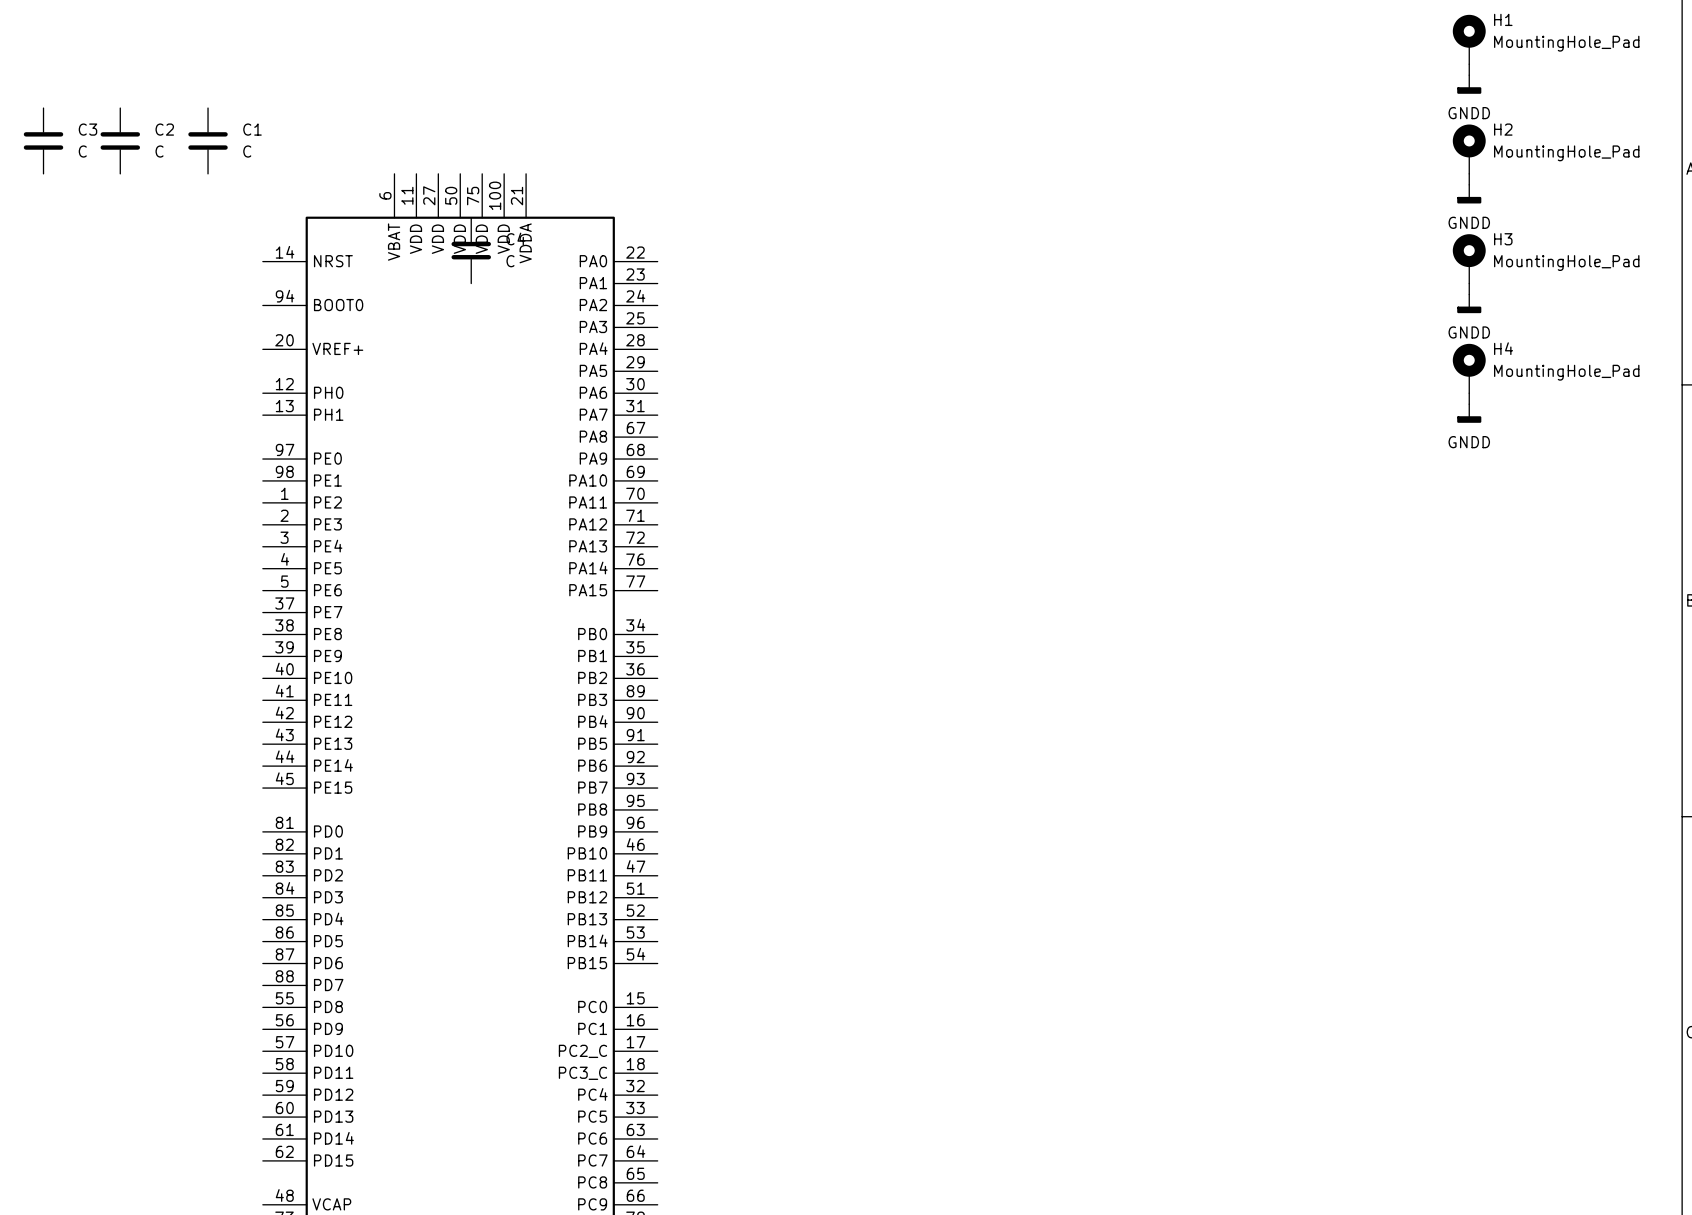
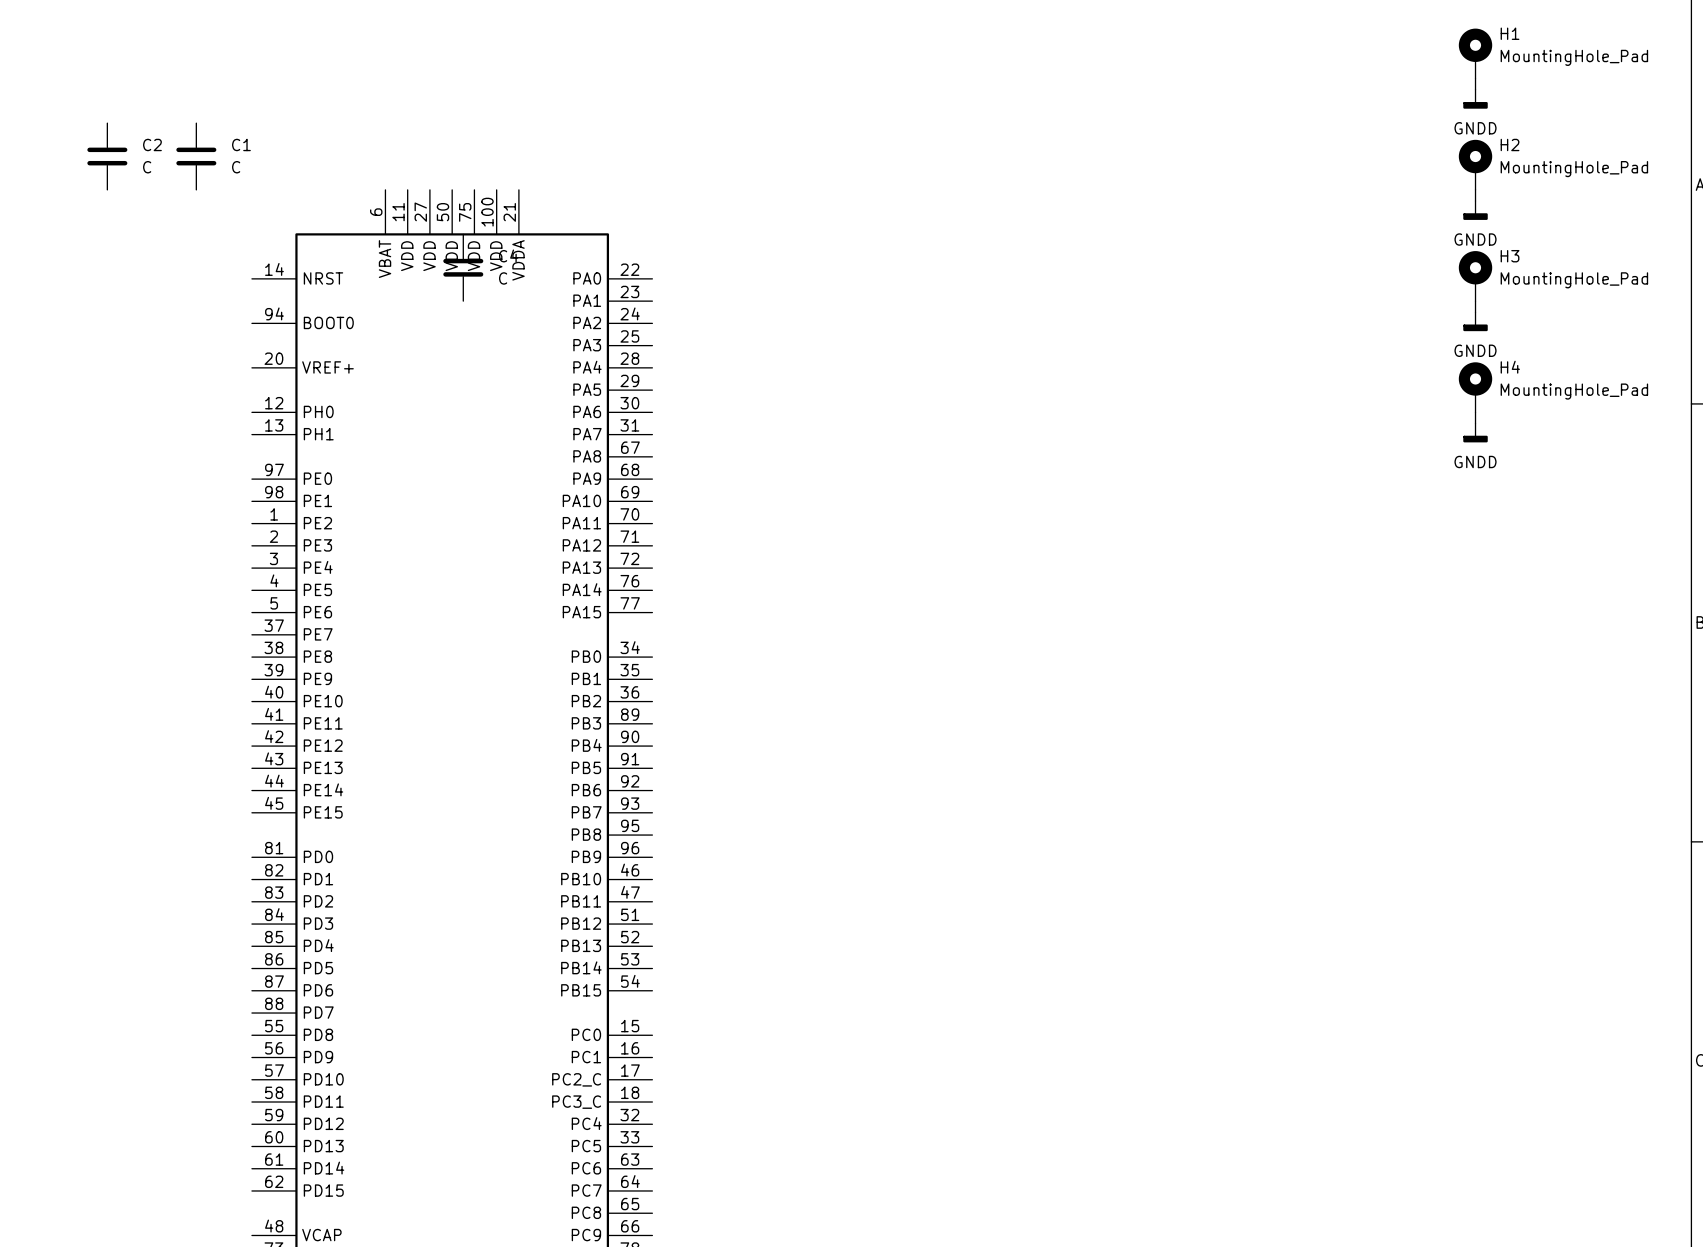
C3: C (43, 140) -> none

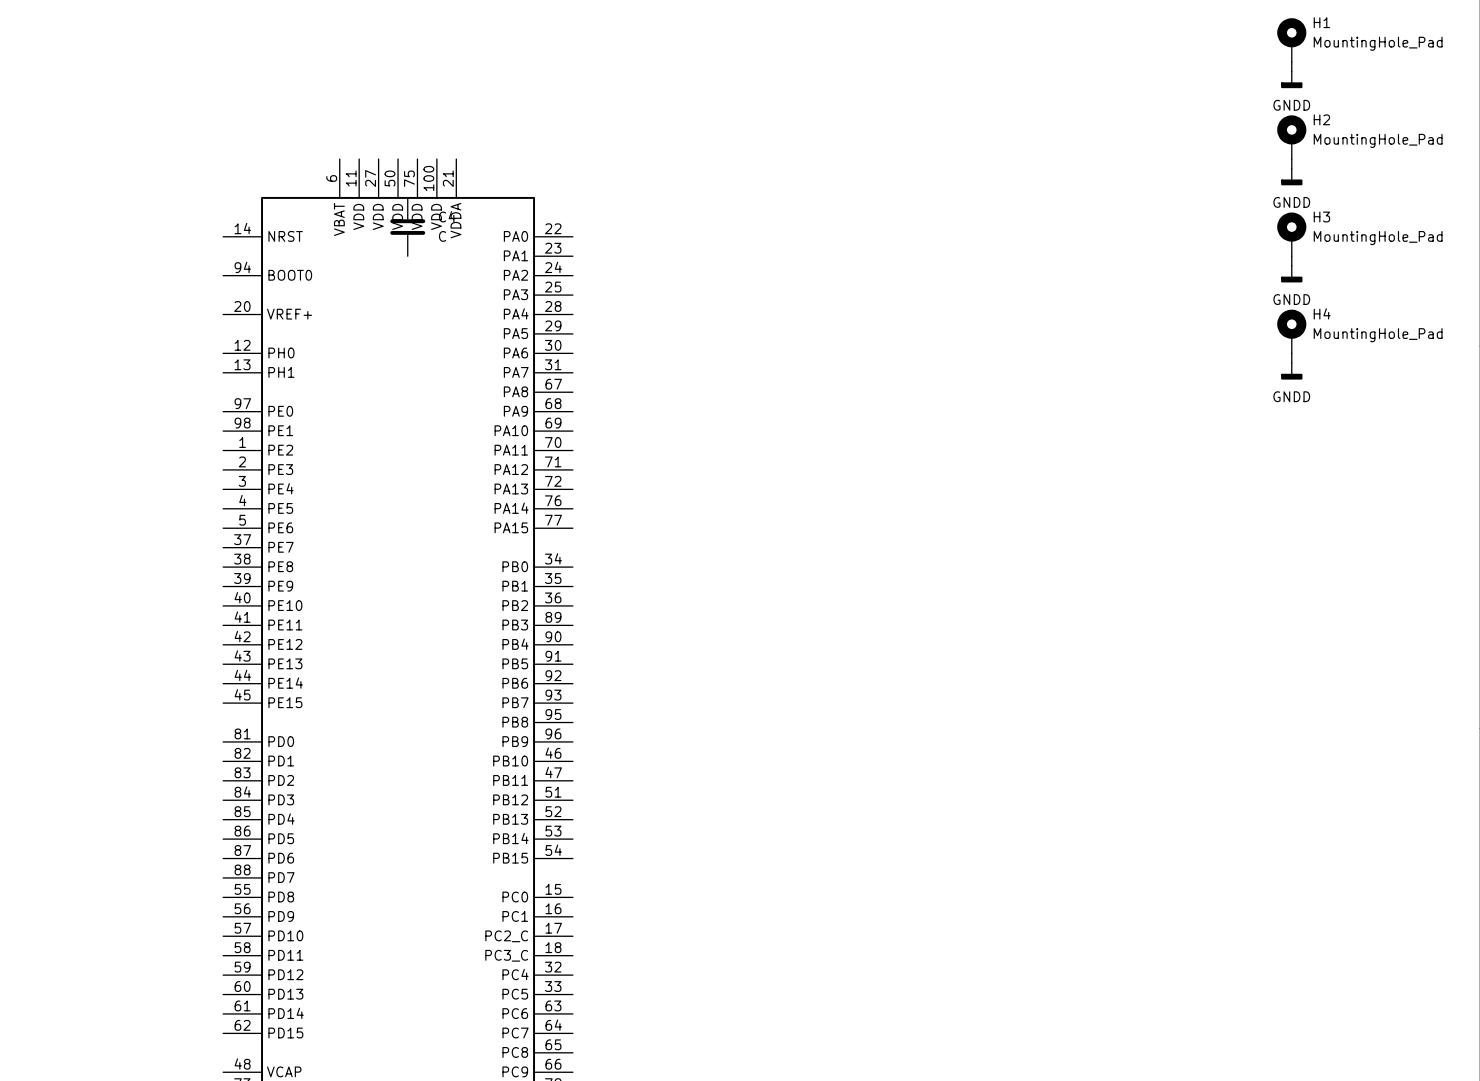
C2: C (107, 156) -> none
C1: C (196, 156) -> none

